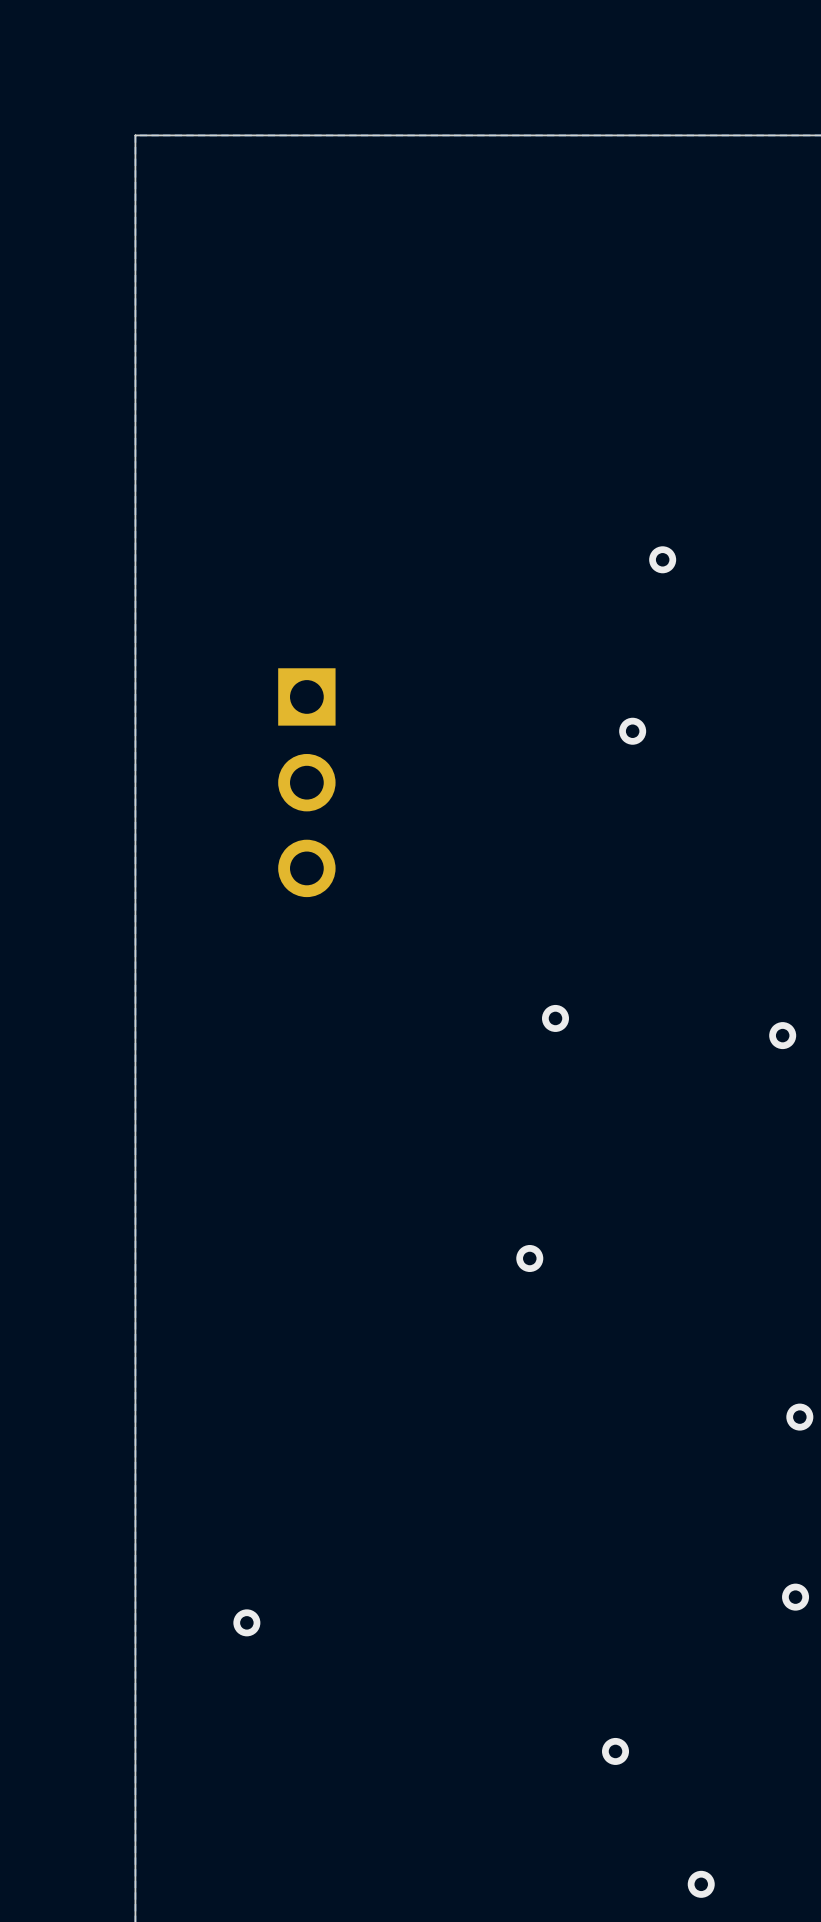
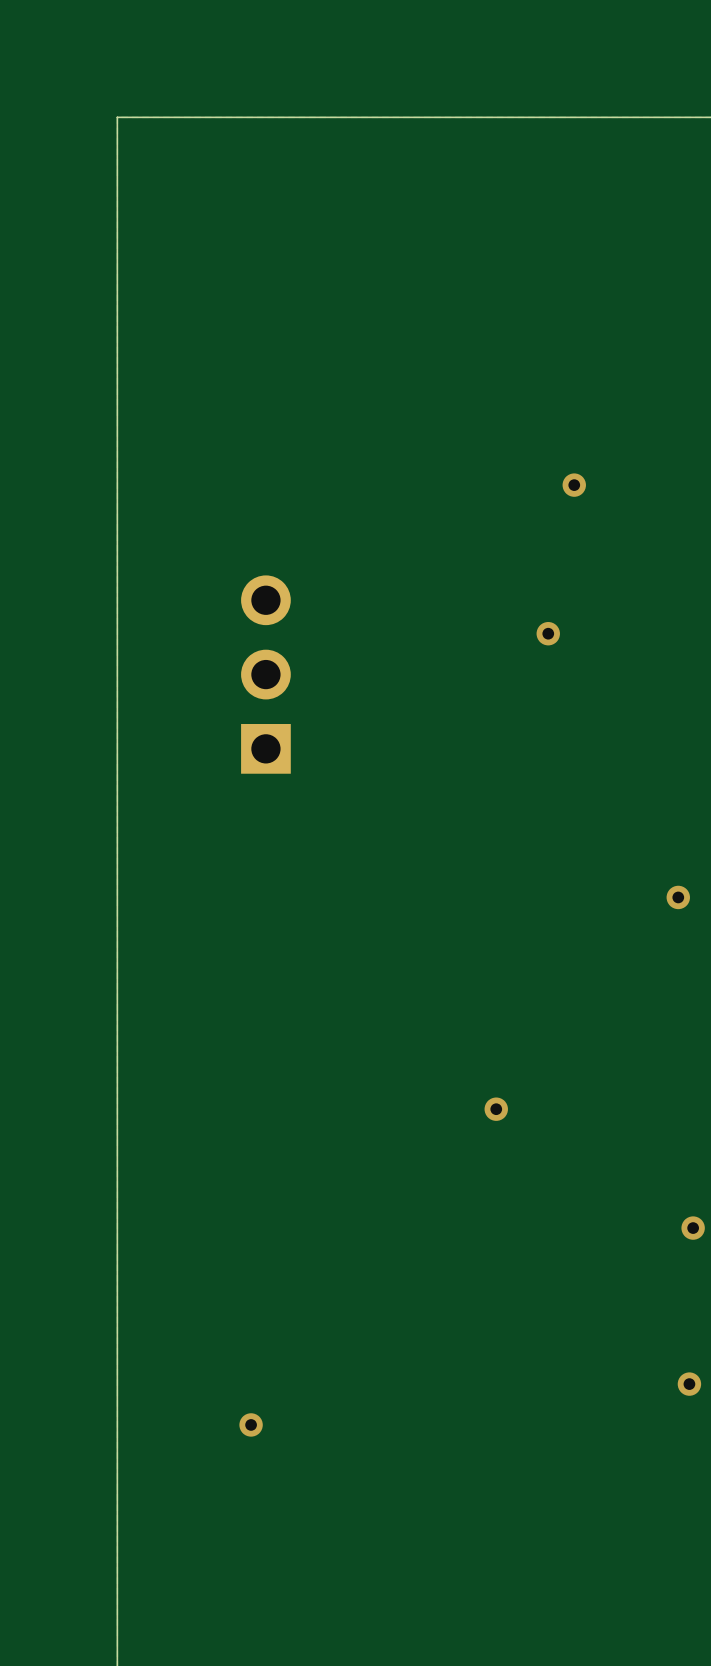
part rotation: 0° (306, 782) -> 180° (265, 674)
via: (555, 1018) -> none
via position: (529, 1258) -> (496, 1109)
via position: (246, 1622) -> (251, 1424)
via: (615, 1751) -> none
via: (701, 1884) -> none

